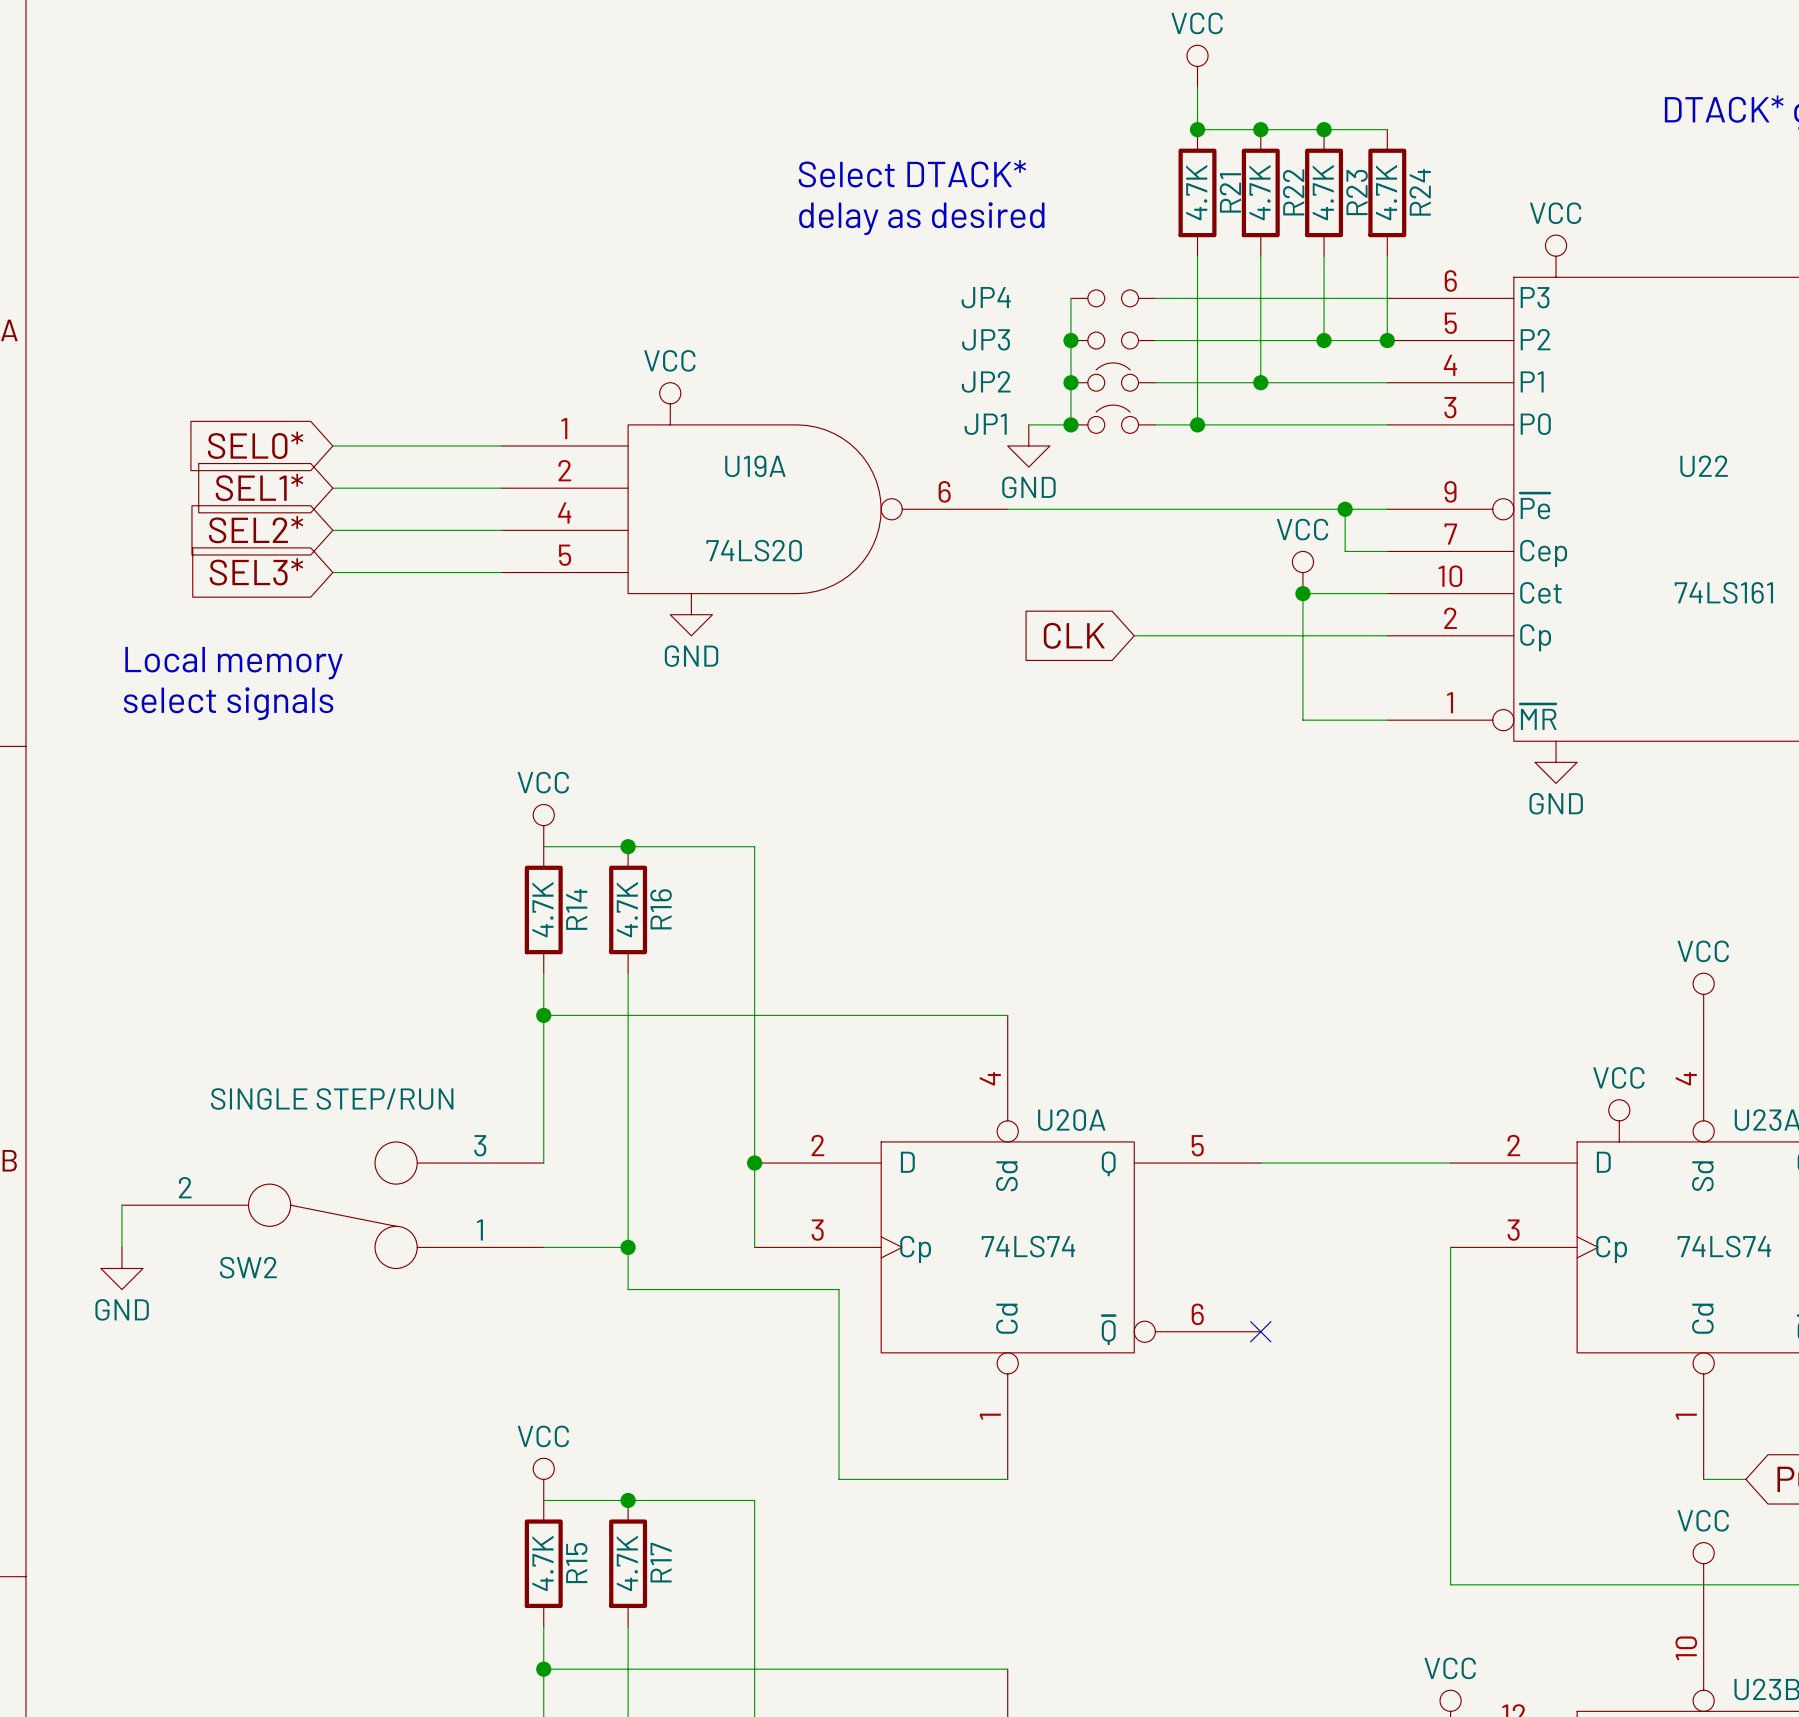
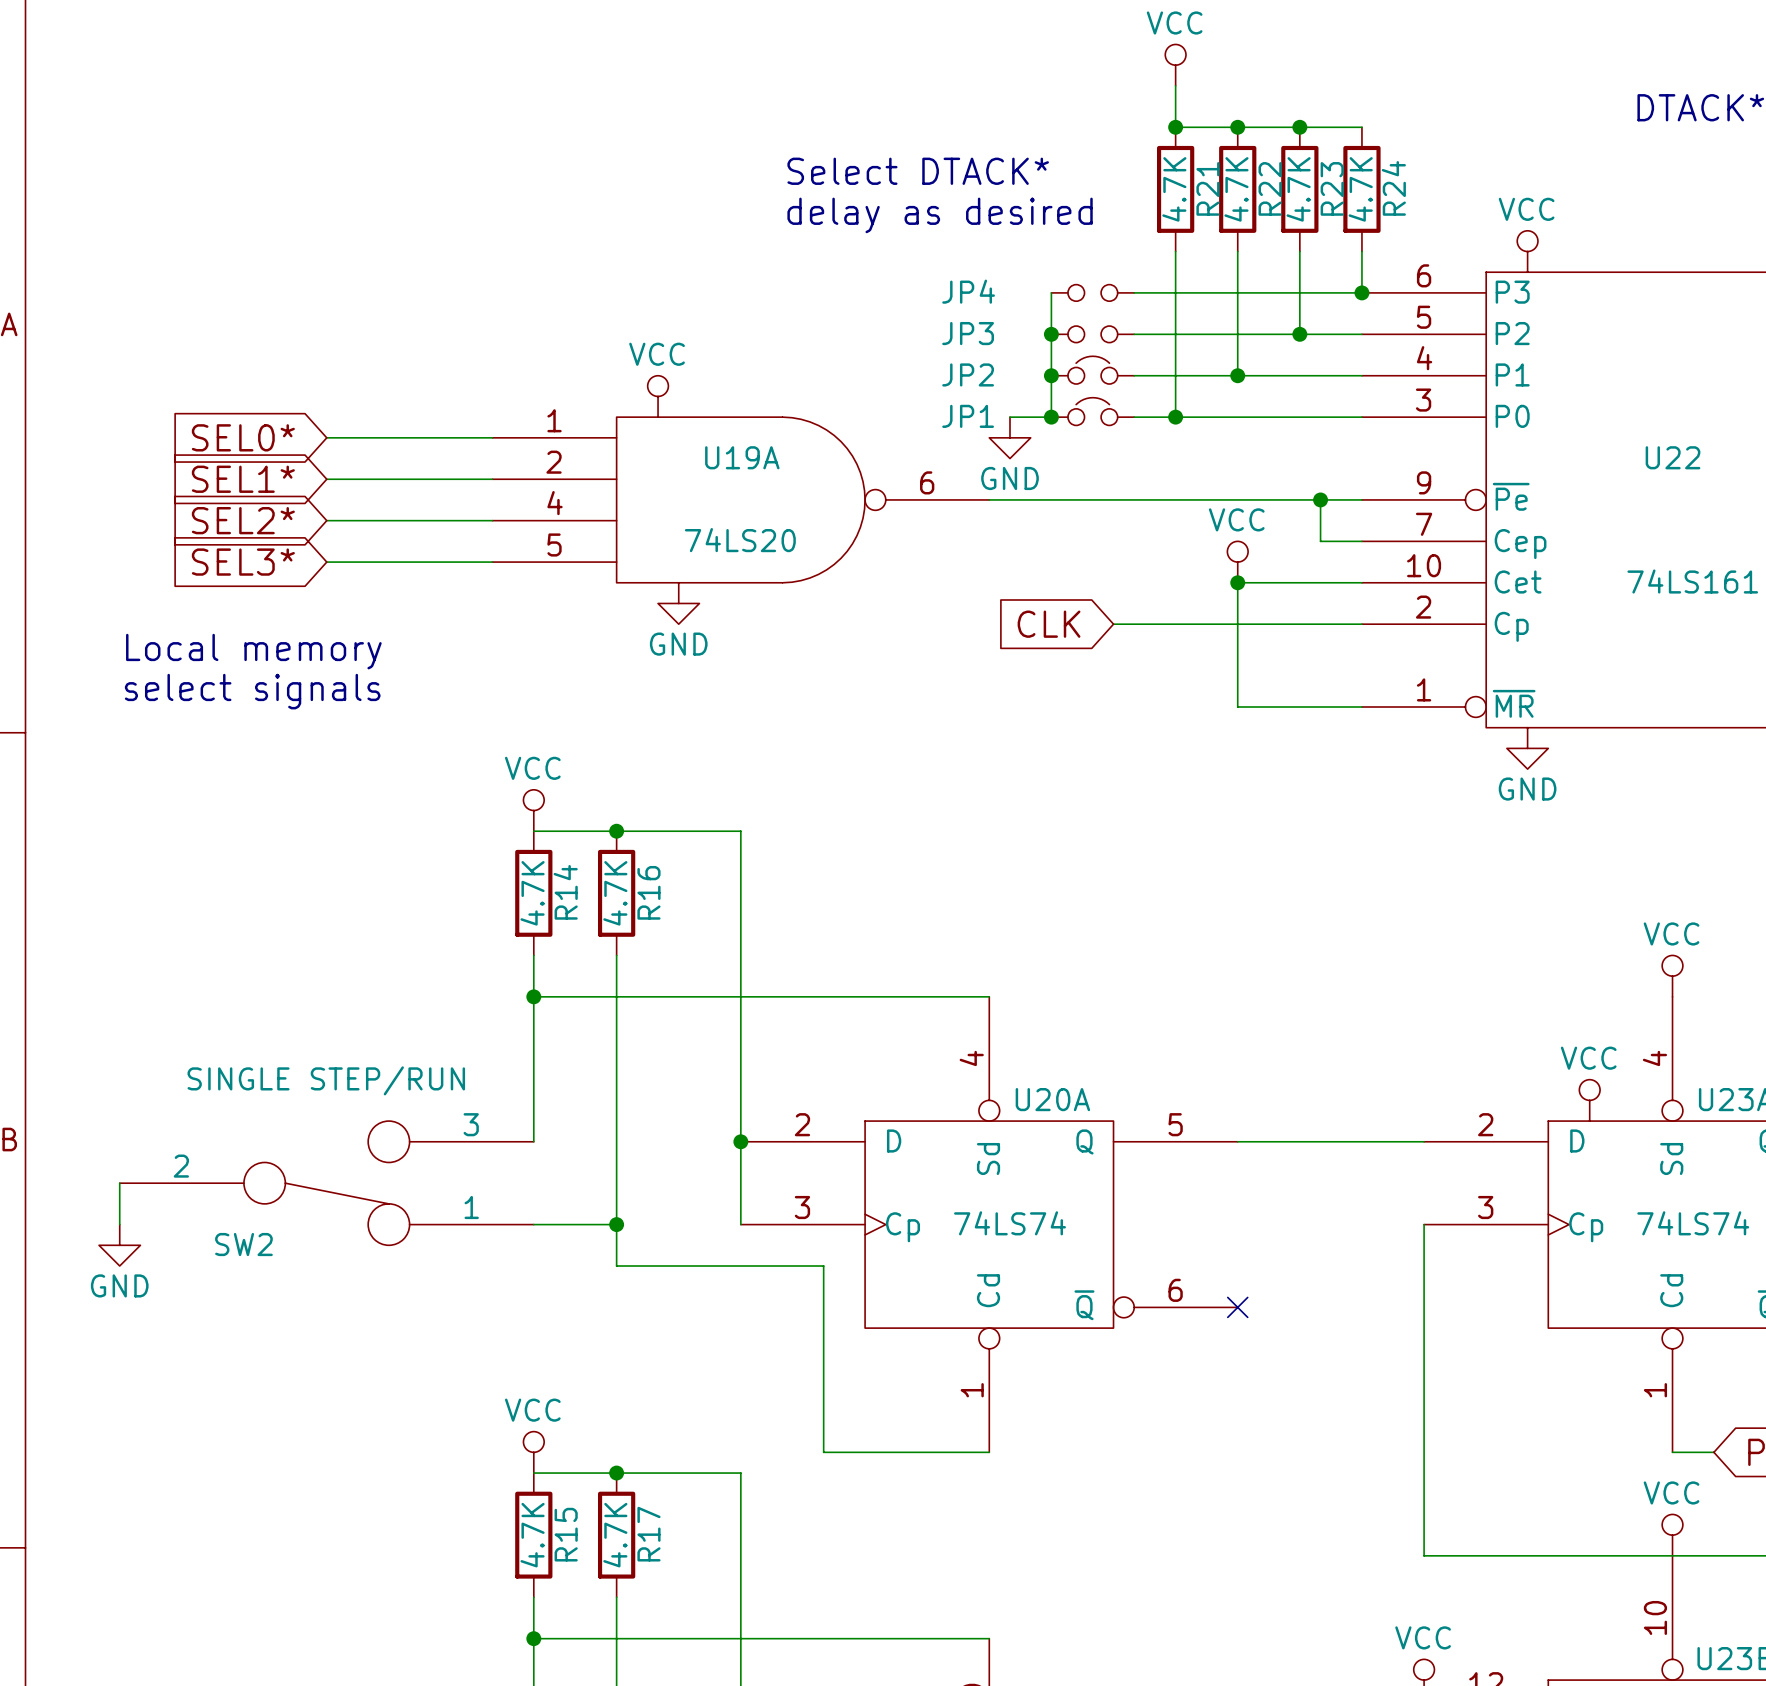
wire: (1387, 298) (1387, 340) -> none
junction position: (1387, 340) -> (1361, 292)
power symbol position: VCC (1302, 572) -> VCC (1237, 562)
wire: (1302, 593) (1302, 720) -> (1279, 582) (1237, 582) (1237, 706) (1279, 706)
junction position: (1302, 593) -> (1237, 582)

